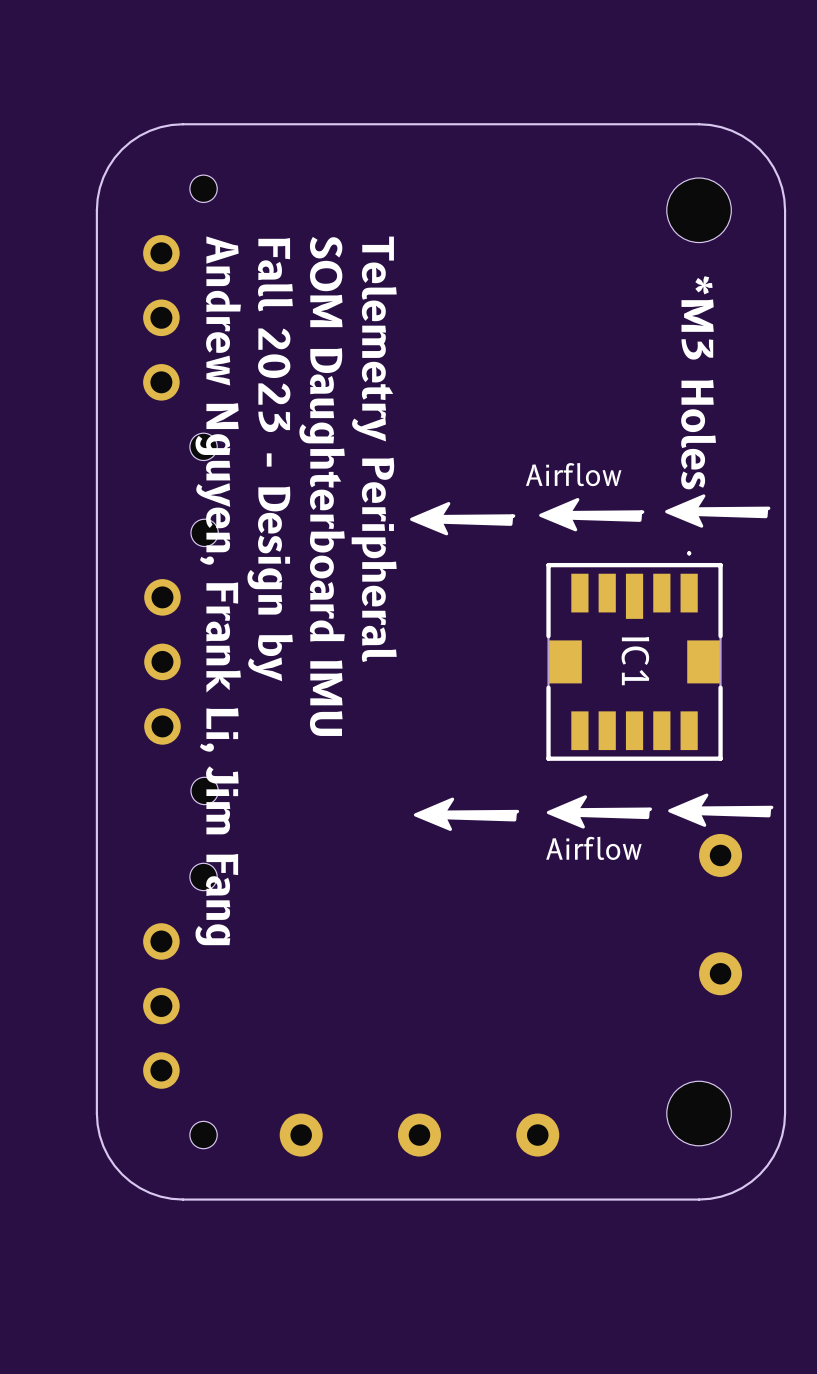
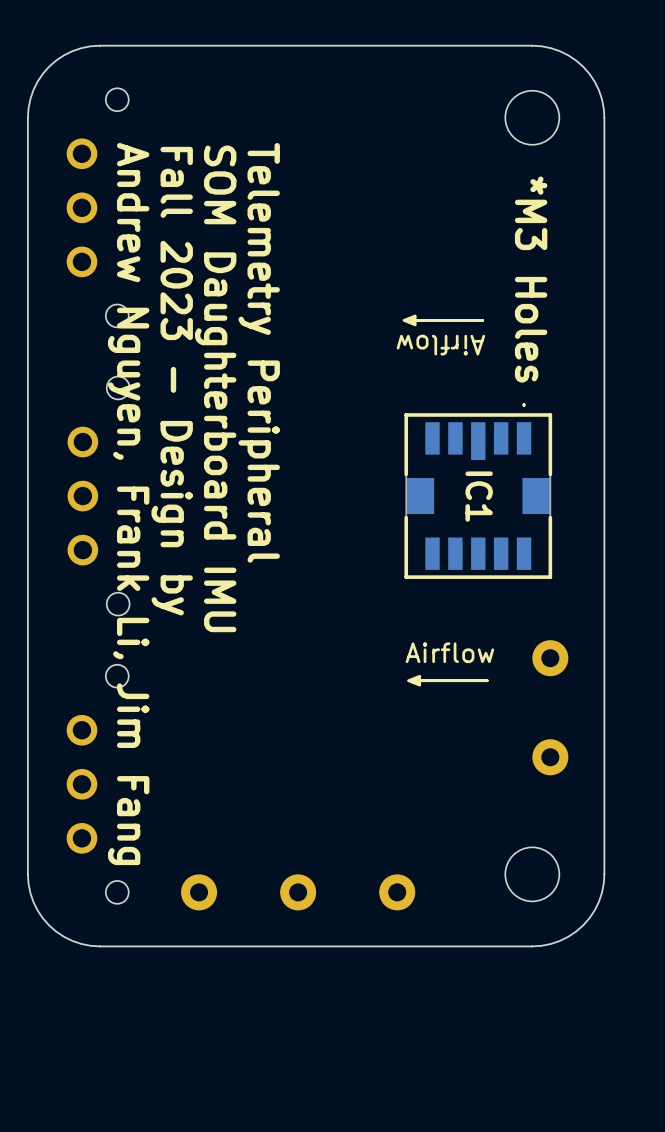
drawing: none -> [402, 314, 485, 327]
text rotation: 0° (573, 474) -> 180° (440, 345)
drawing: [410, 494, 771, 536] -> none
drawing: [546, 793, 774, 829] -> none
drawing: [413, 797, 520, 831] -> none
drawing: none -> [407, 674, 489, 687]

